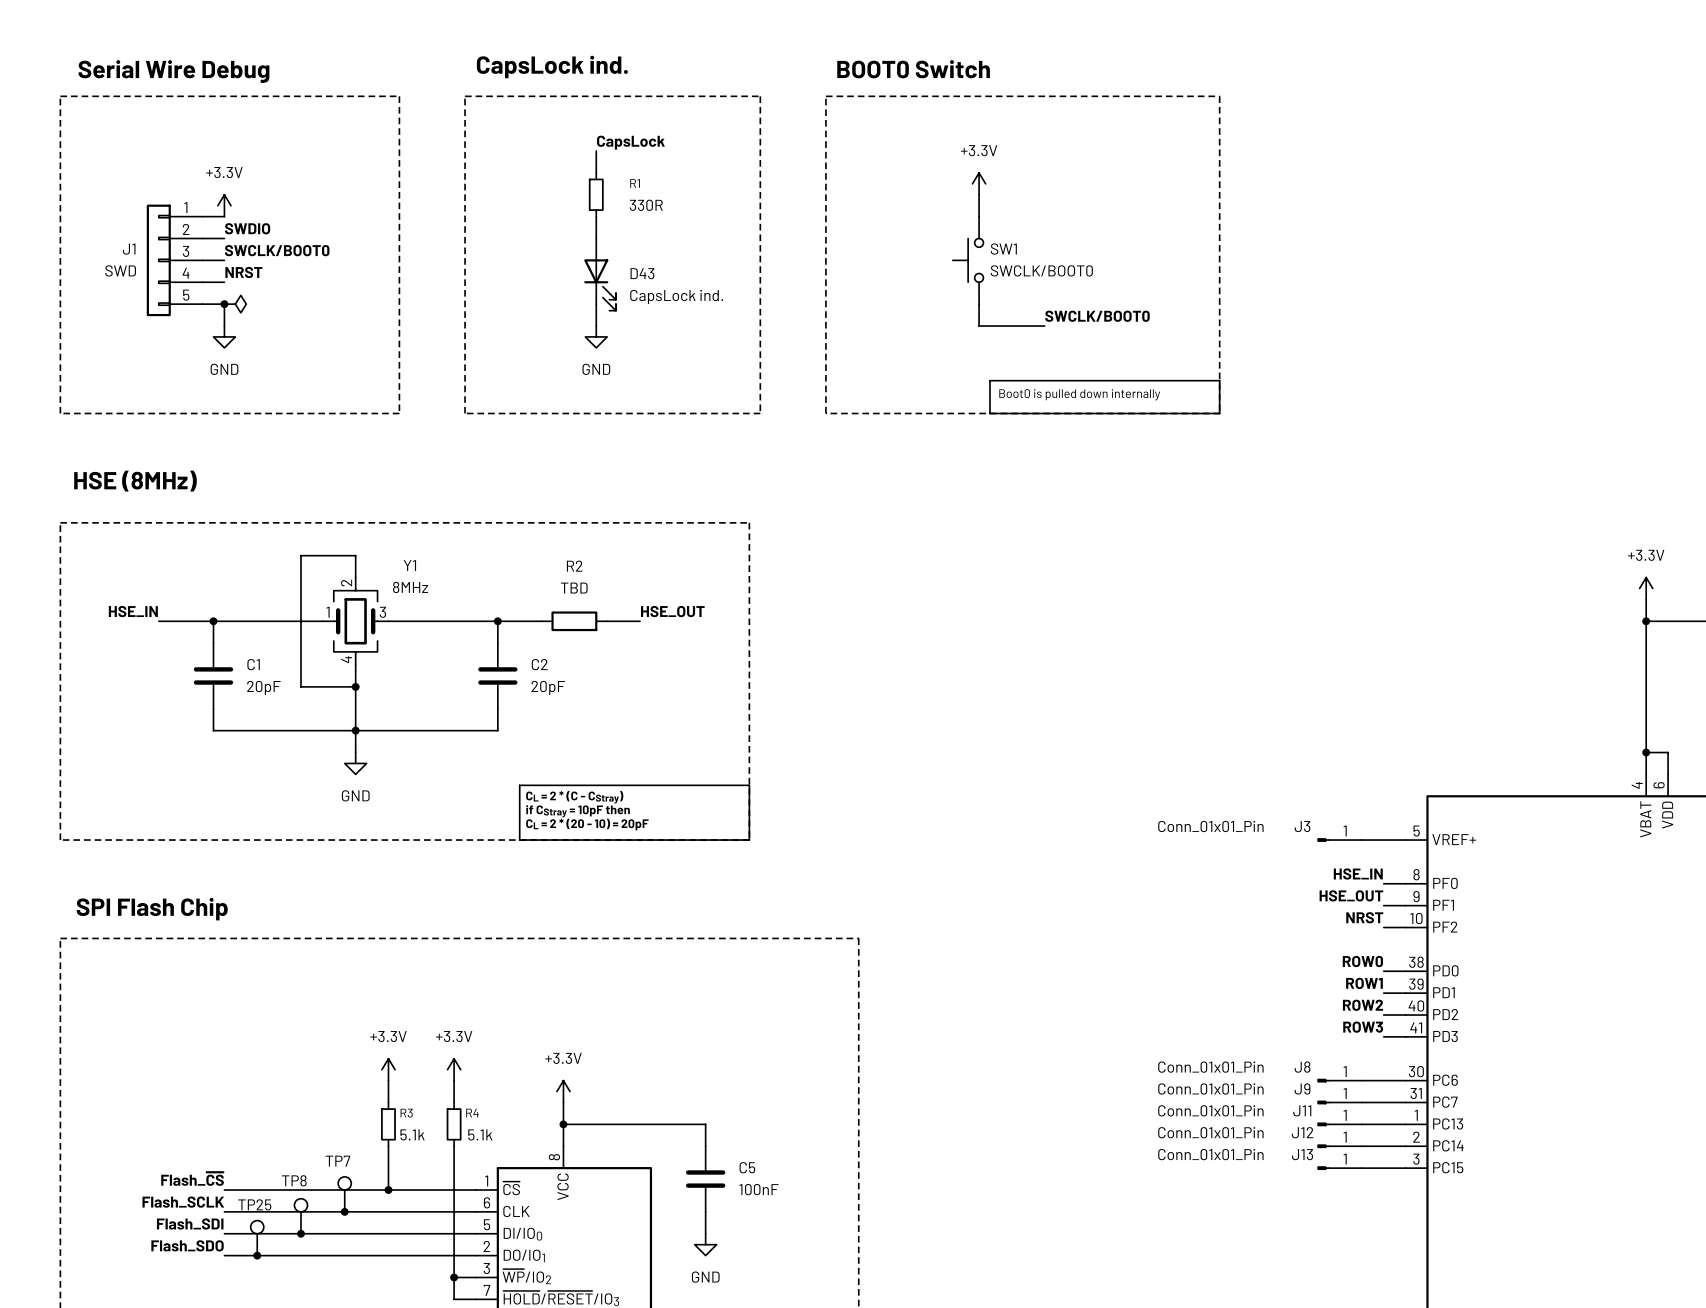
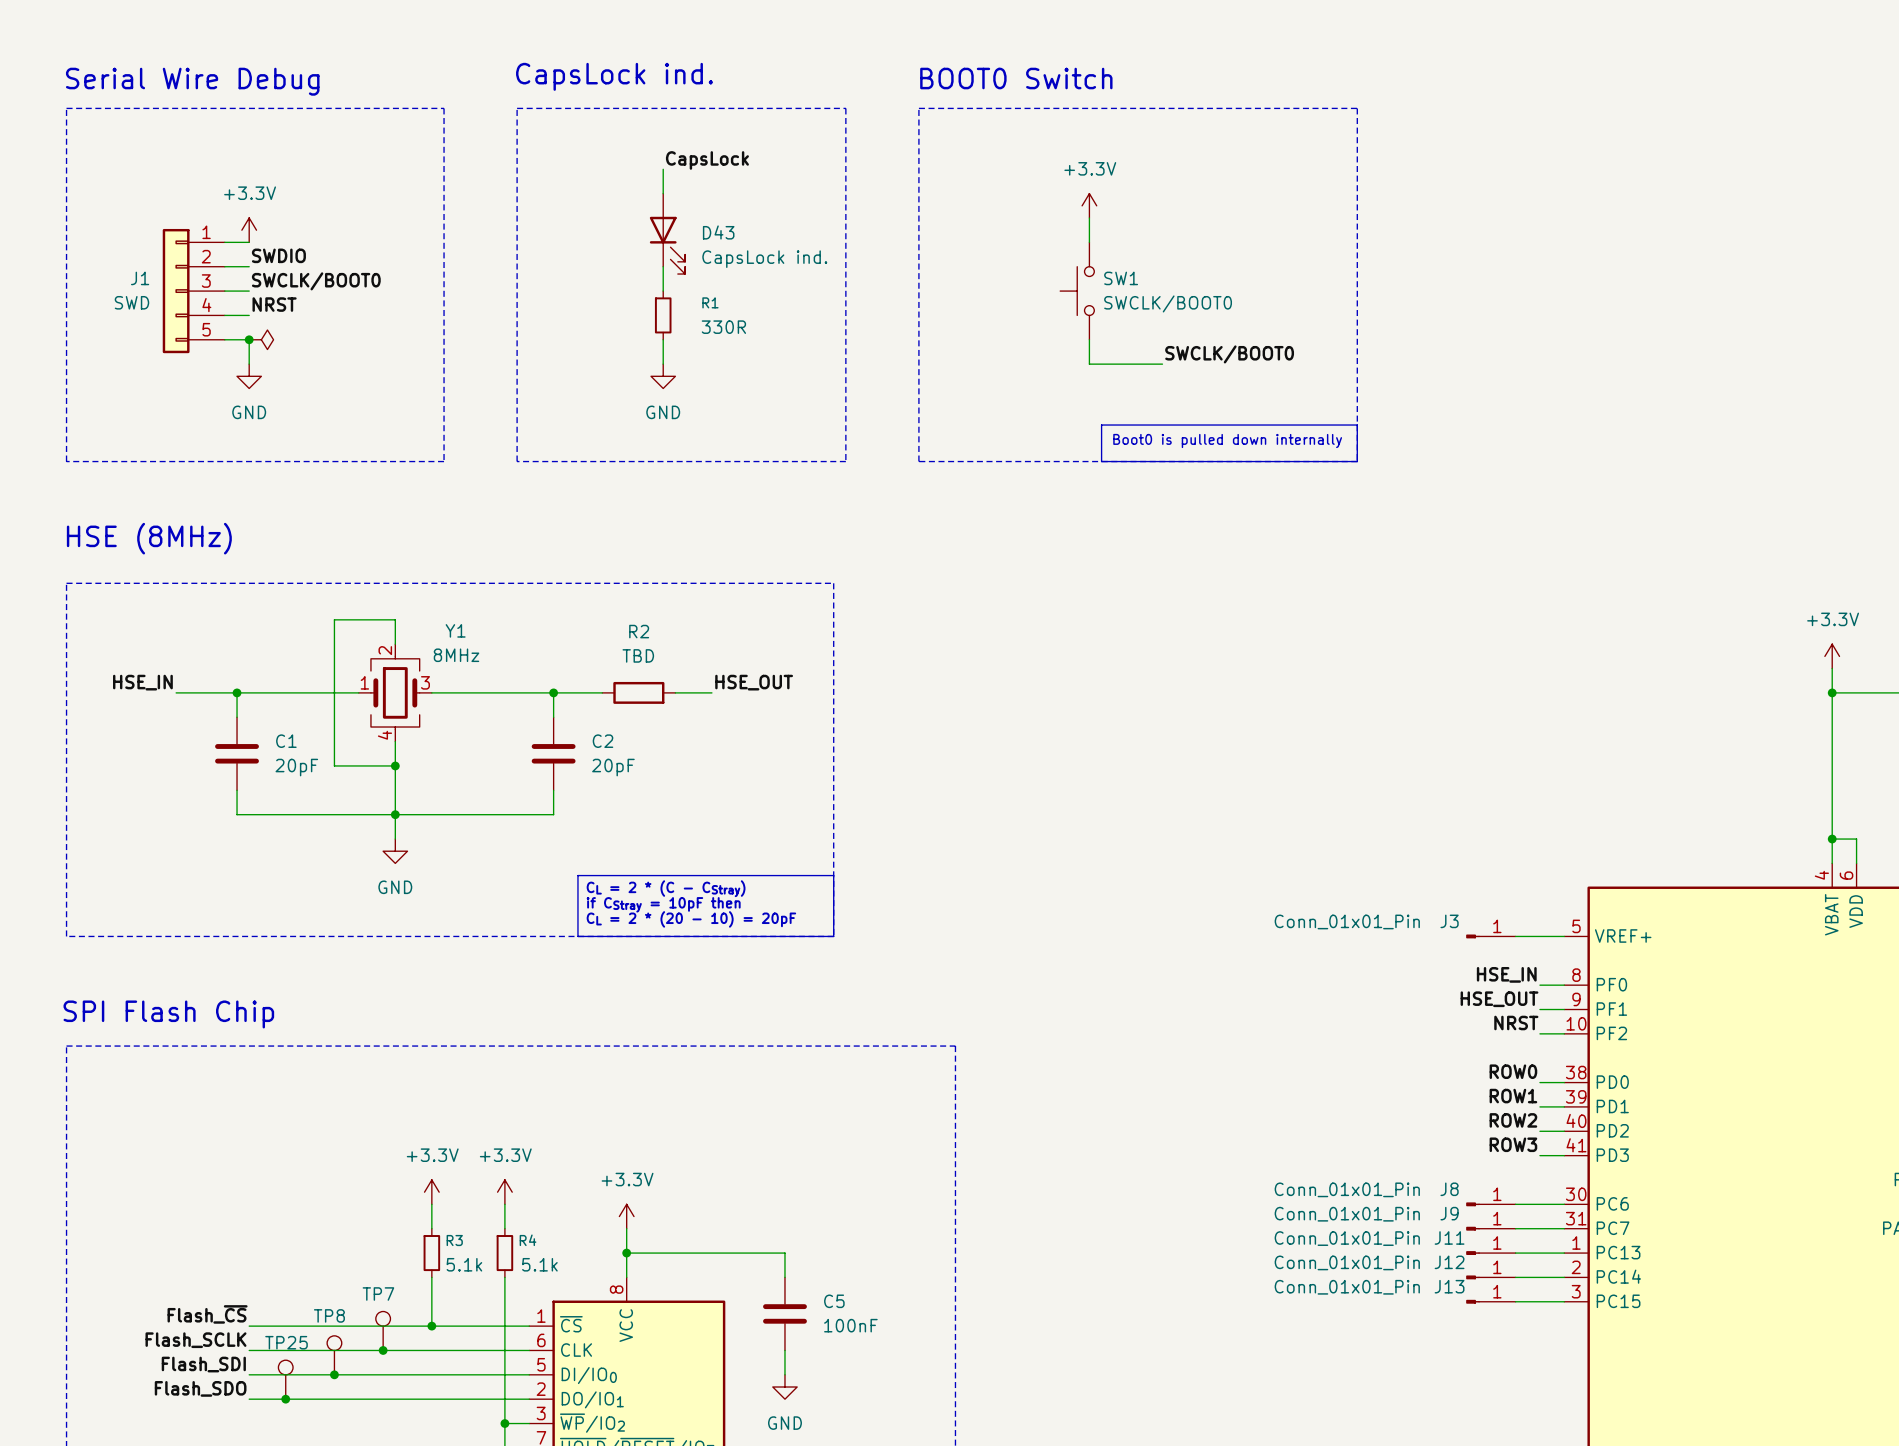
R1 position: (596, 194) -> (663, 315)
D43 position: (600, 274) -> (667, 233)

